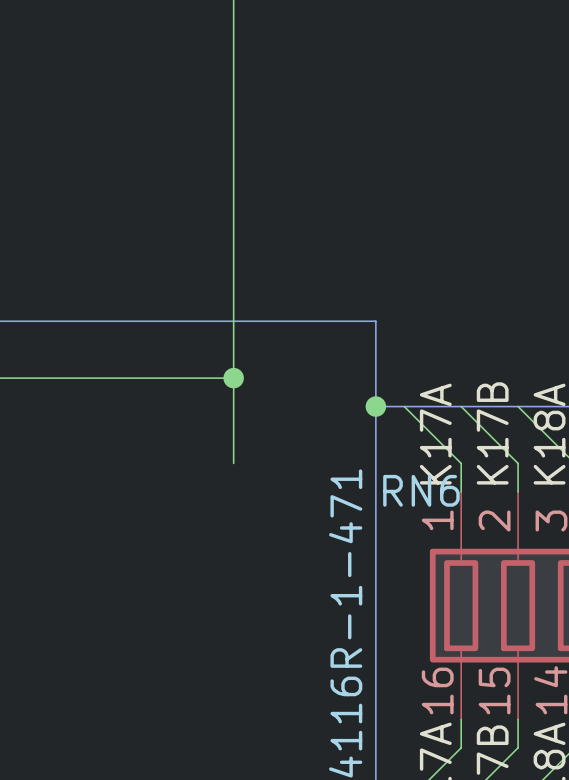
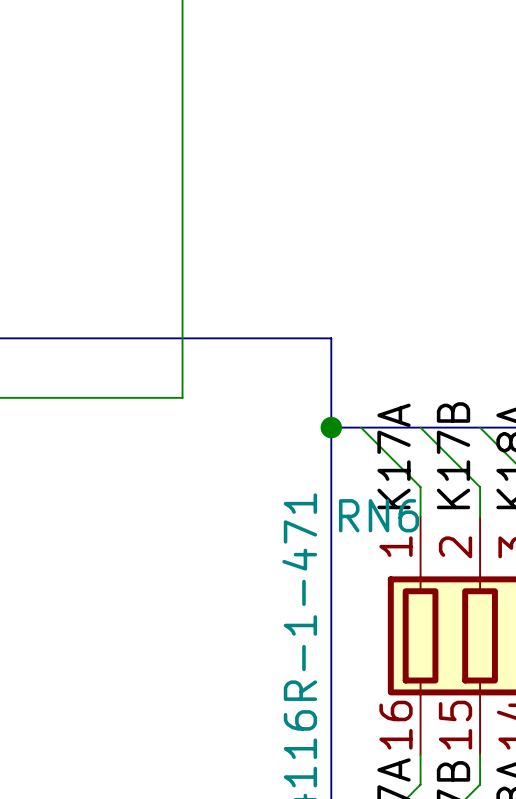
wire: (233, 378) (233, 463) -> none
junction: (233, 378) -> none

